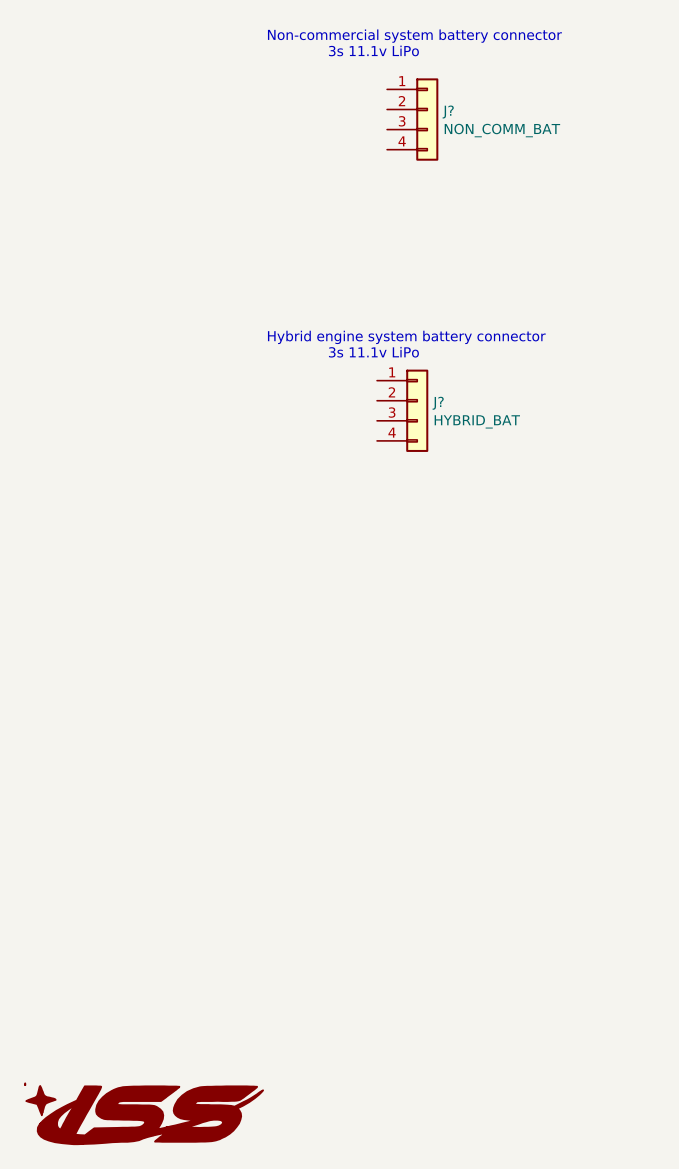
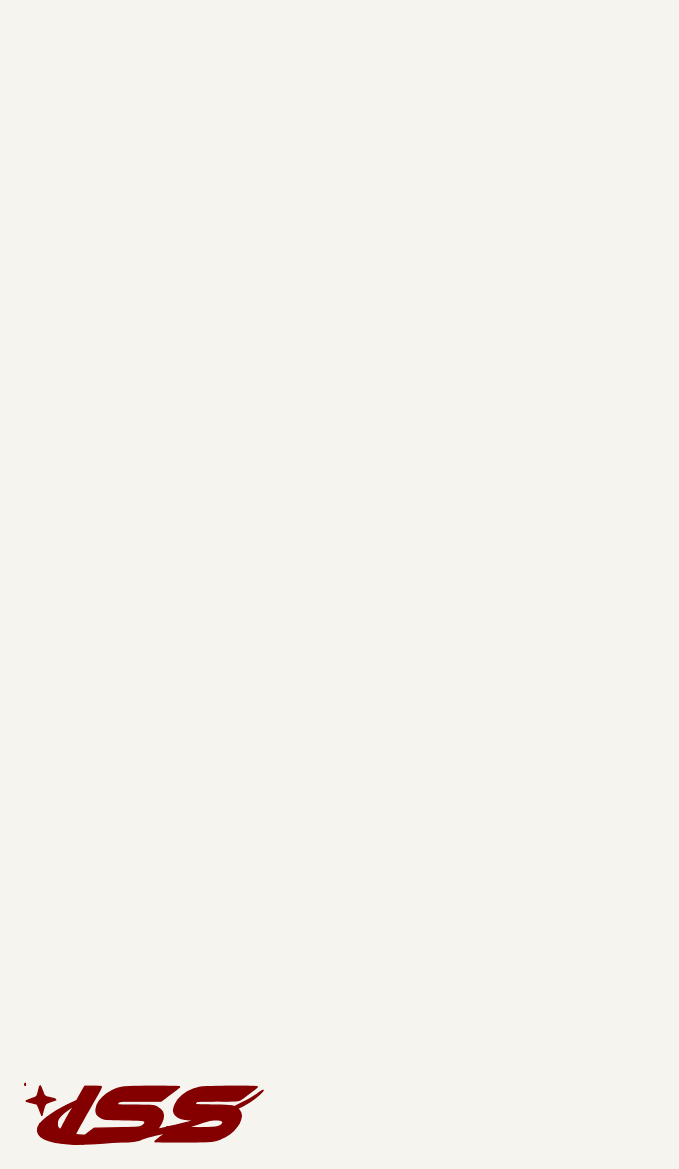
text: Non-commercial system battery connector (414, 36) -> none
text: 3s 11.1v LiPo (373, 50) -> none
J?: NON_COMM_BAT (412, 119) -> none
text: Hybrid engine system battery connector (406, 337) -> none
text: 3s 11.1v LiPo (373, 352) -> none
J?: HYBRID_BAT (402, 410) -> none

